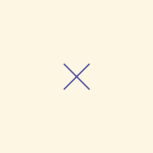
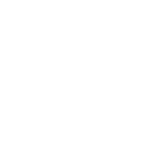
no-connect mark: (76, 76) -> none

